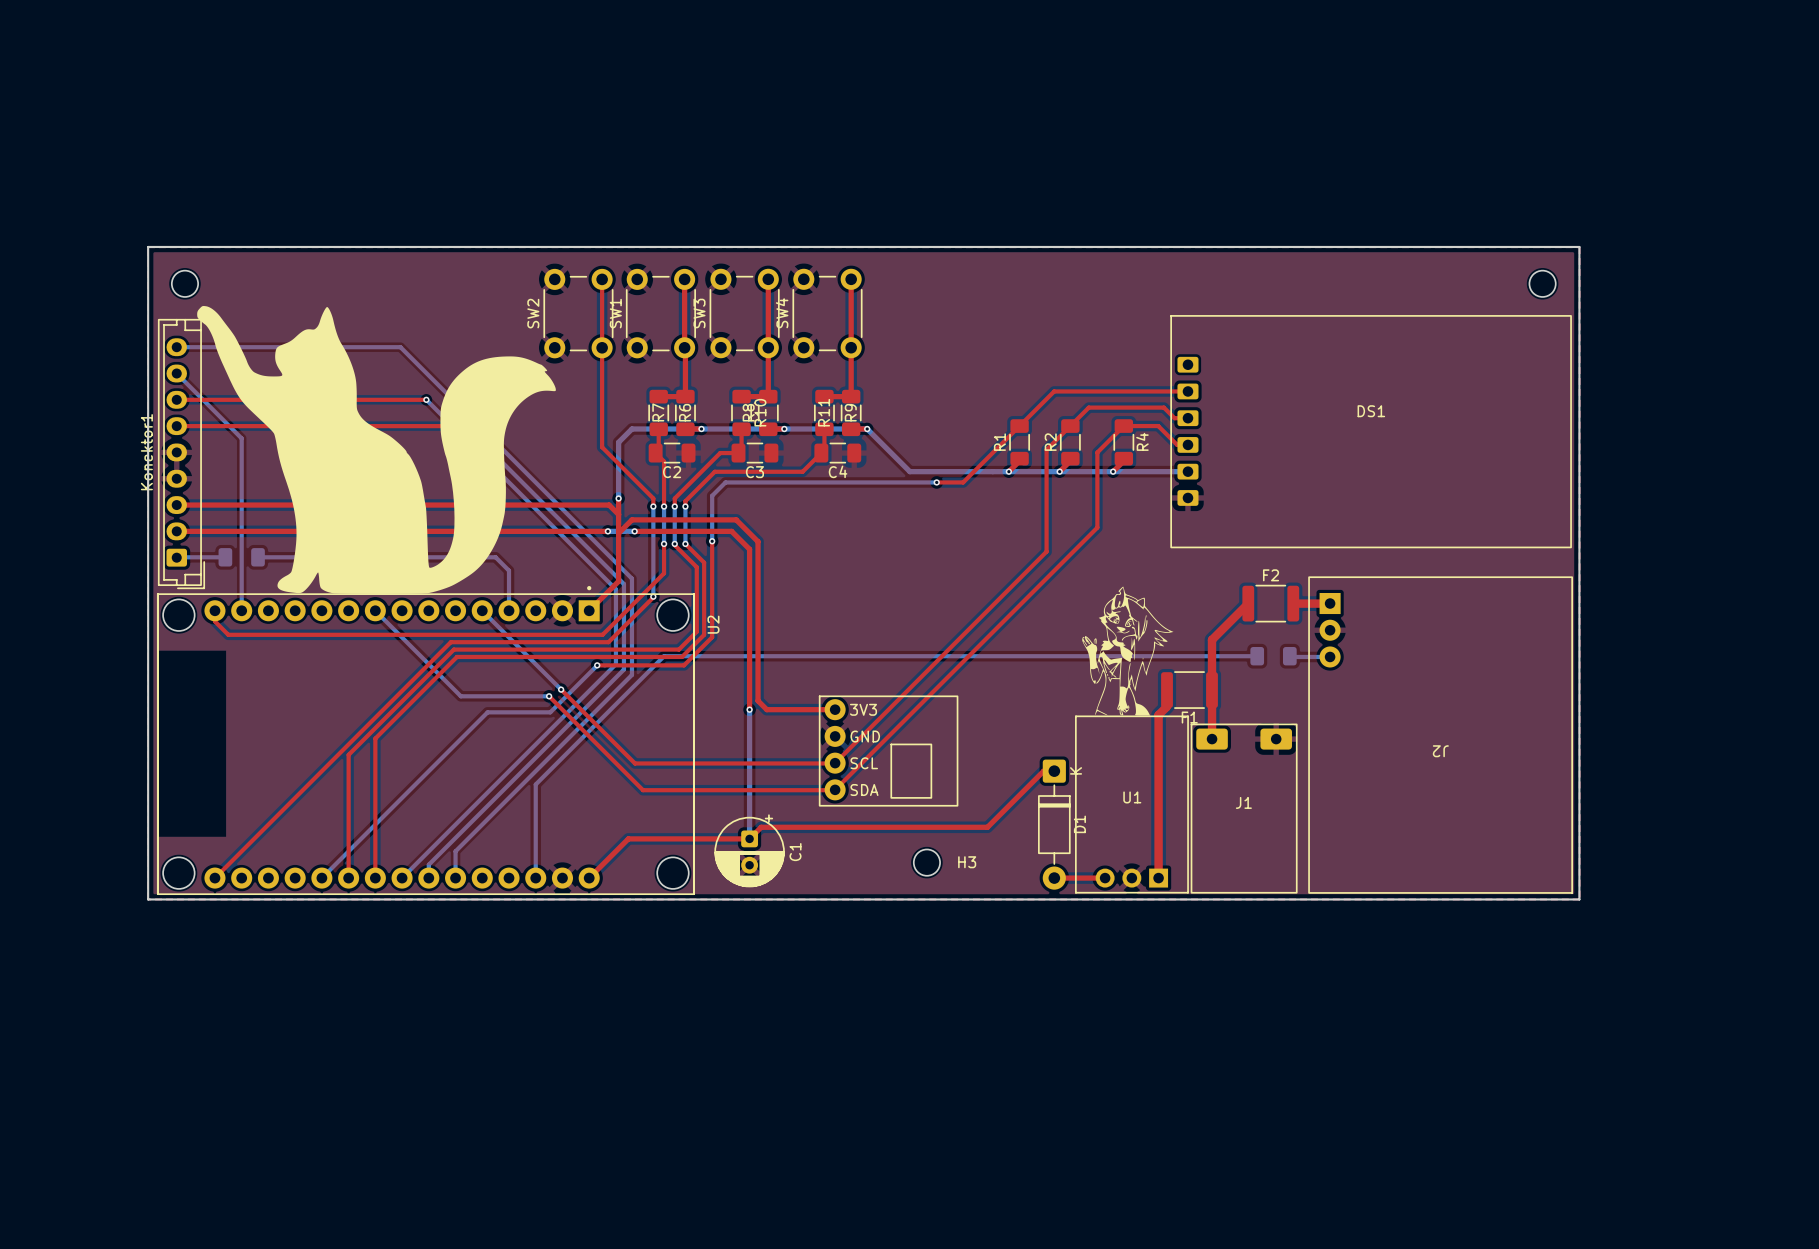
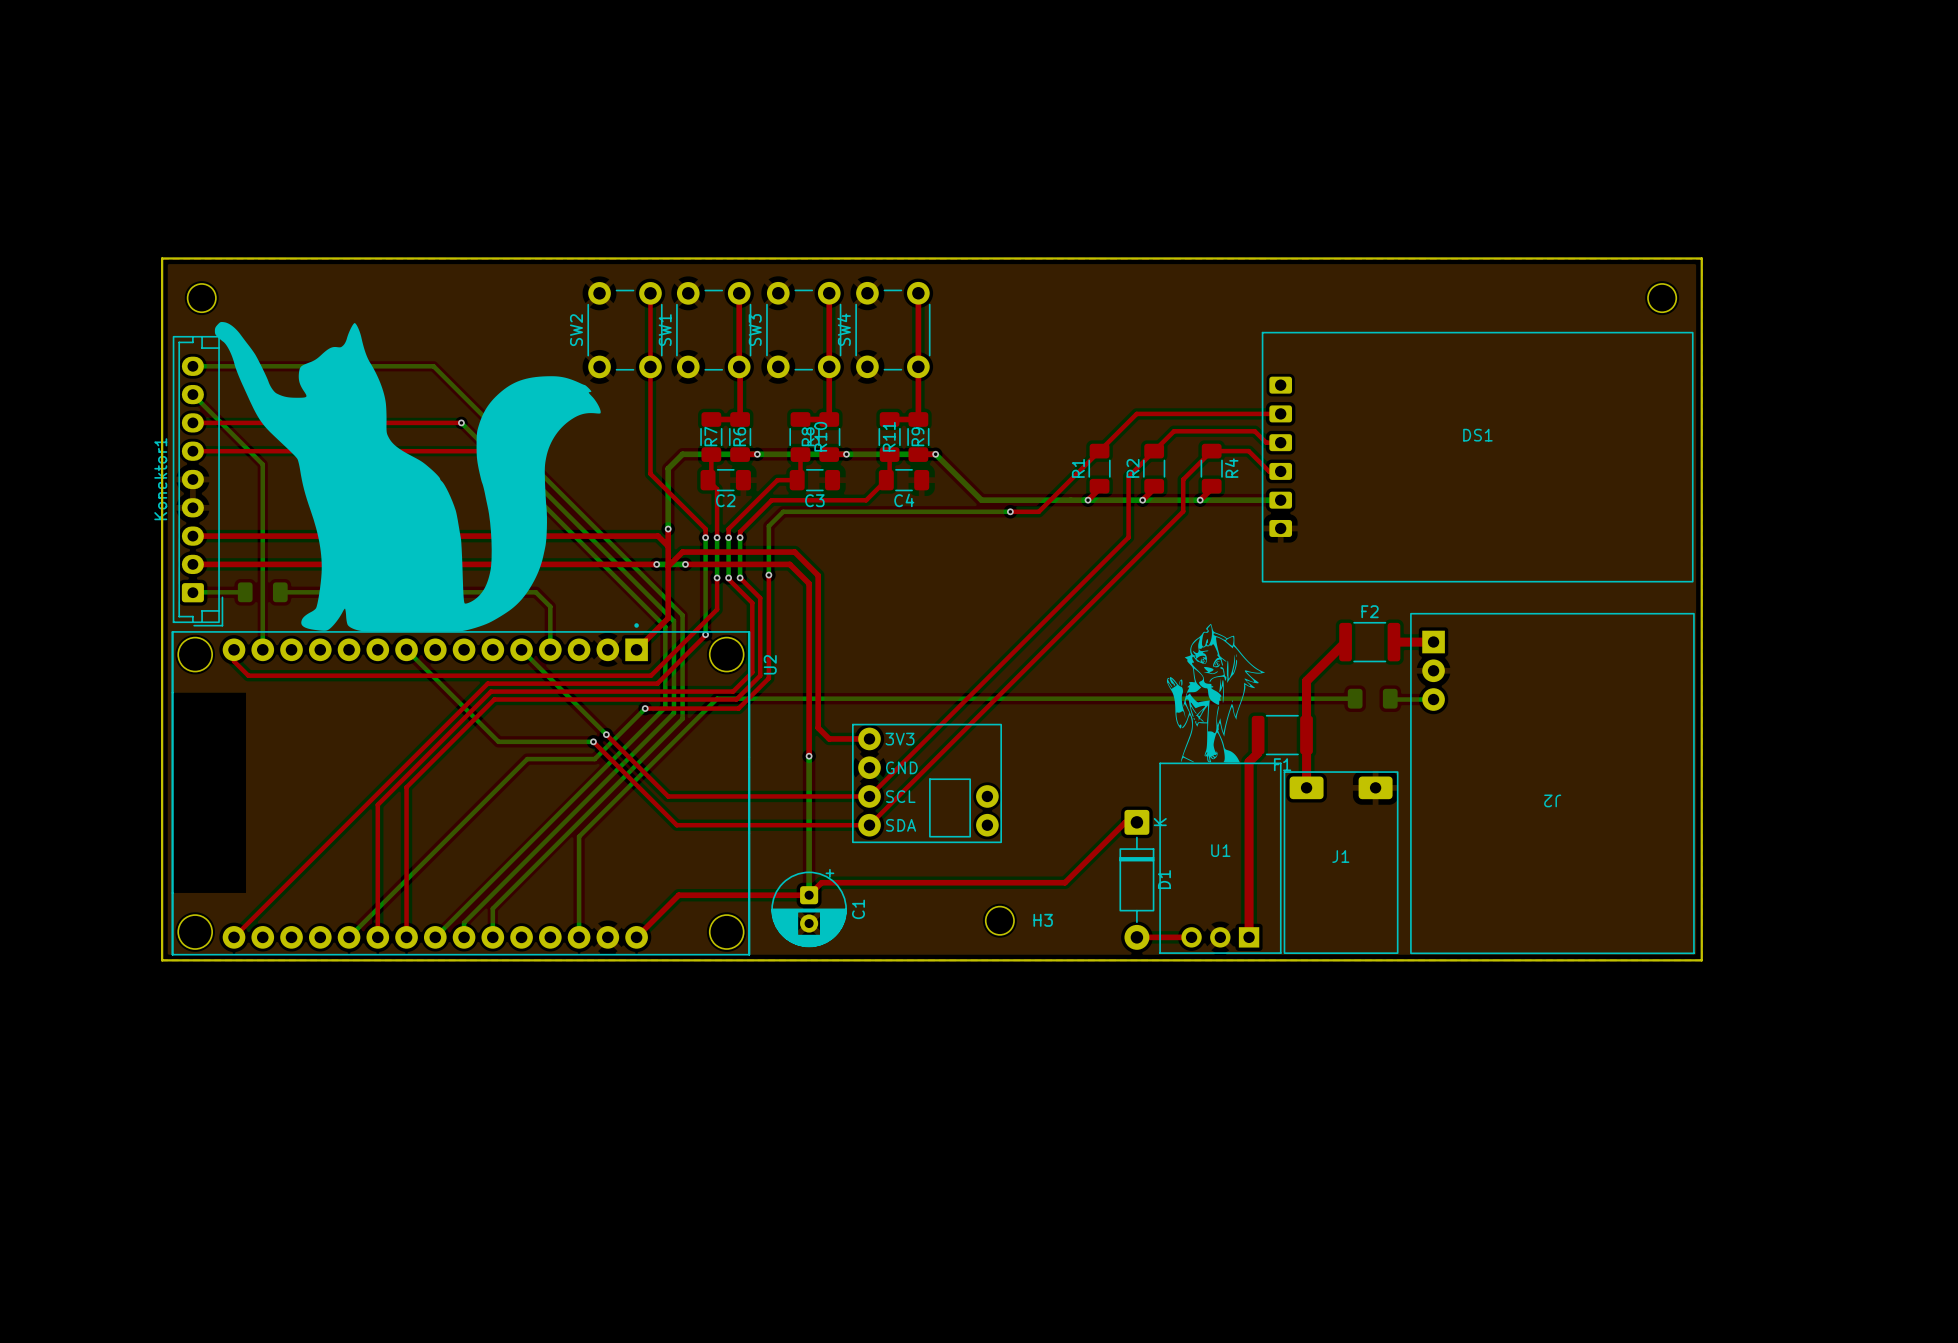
top track: (1097, 482) (1097, 527) (834, 790) (643, 790) (626, 773) -> (1183, 511) (869, 825) (676, 825)
top track: (1046, 506) (1046, 551) (834, 763) (634, 763) (618, 747) -> (1128, 537) (869, 796) (668, 796)
top track: (758, 683) (758, 700) (766, 709) (835, 709) -> (818, 727) (829, 738) (869, 738)
part: none -> (927, 783)
part: (888, 751) -> none

